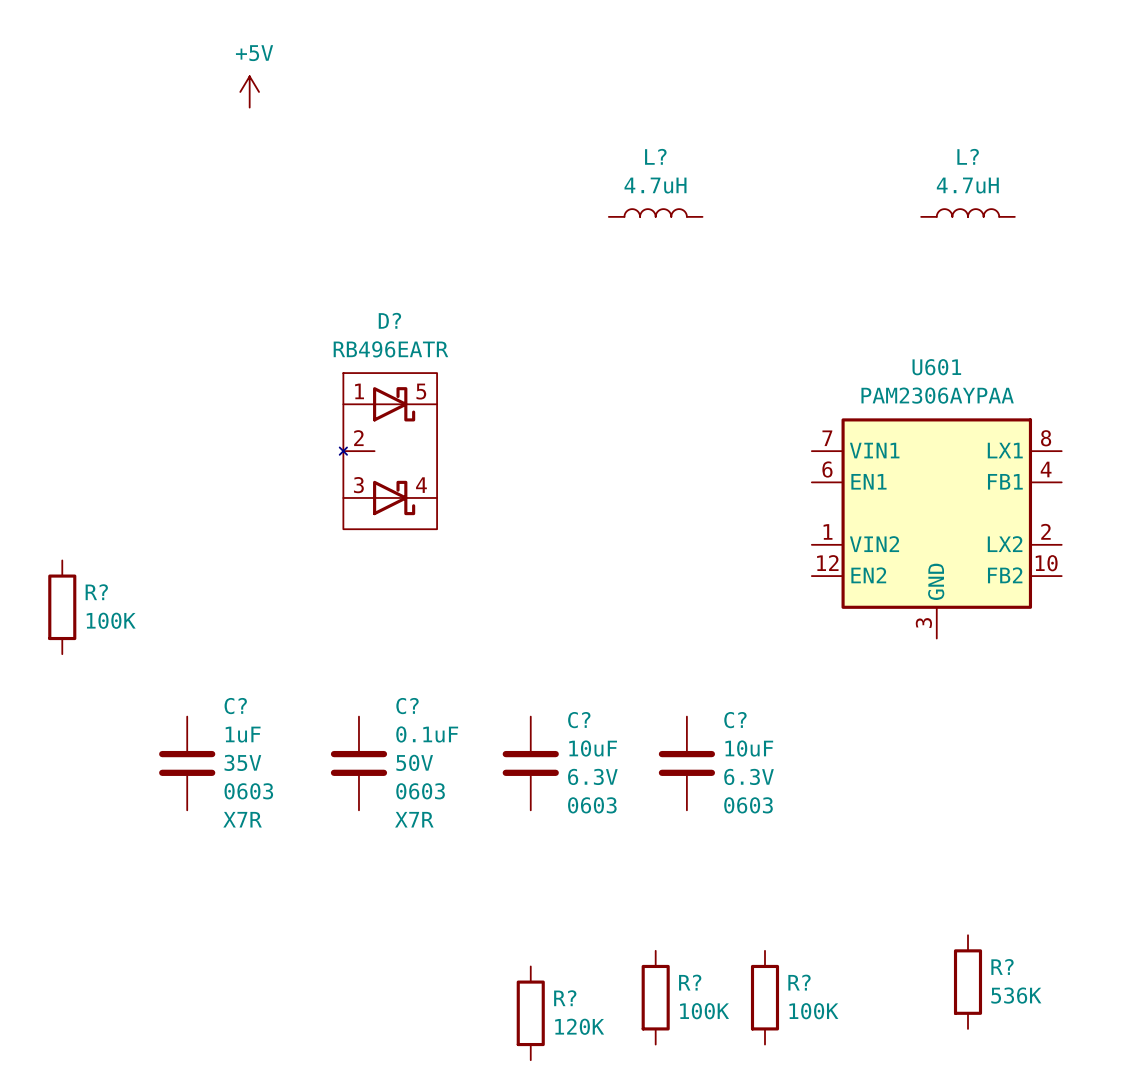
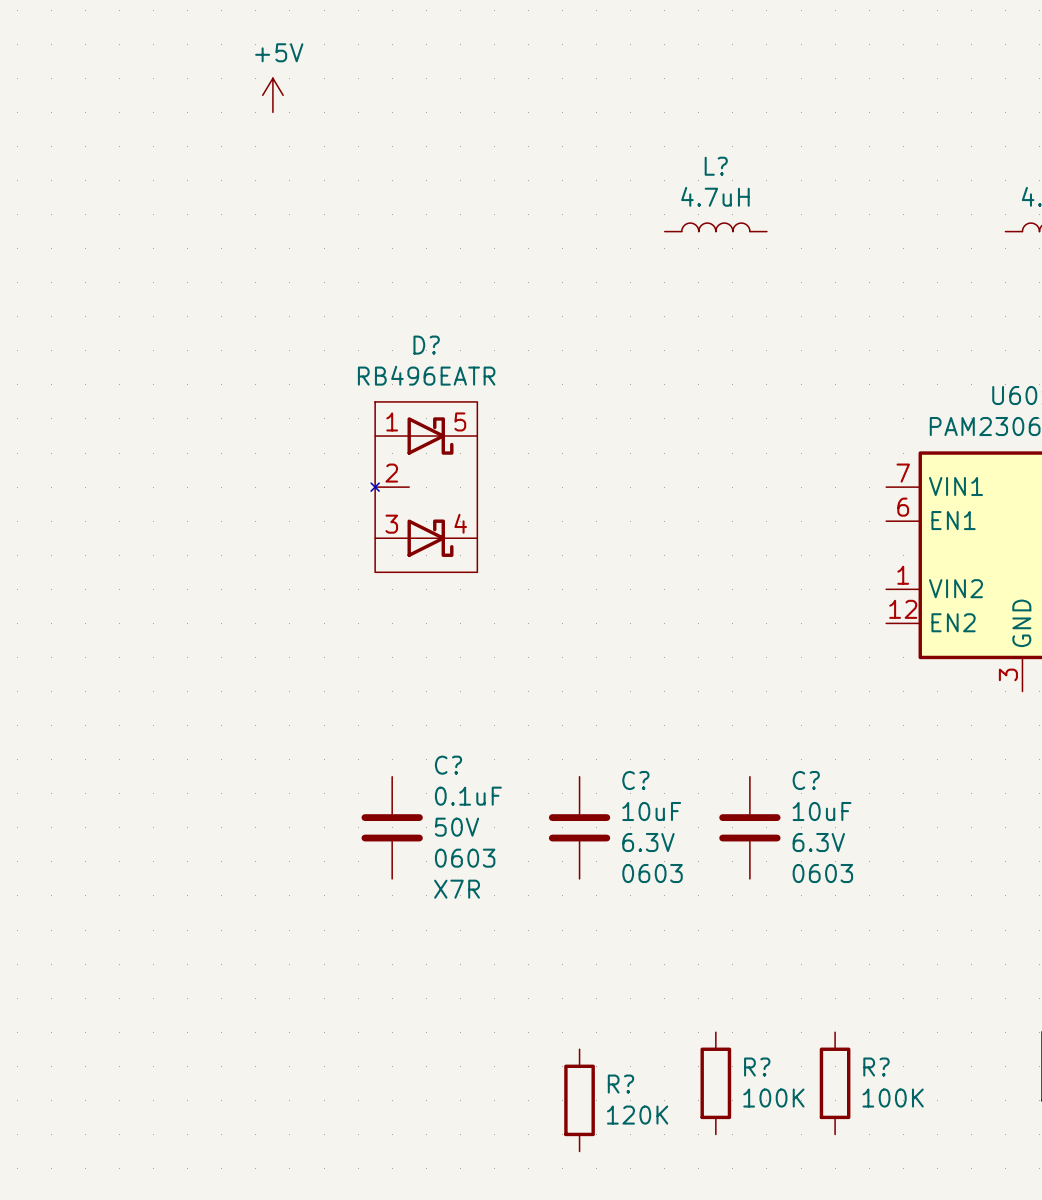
R?: 100K (62, 607) -> none
C?: 1uF (187, 763) -> none

